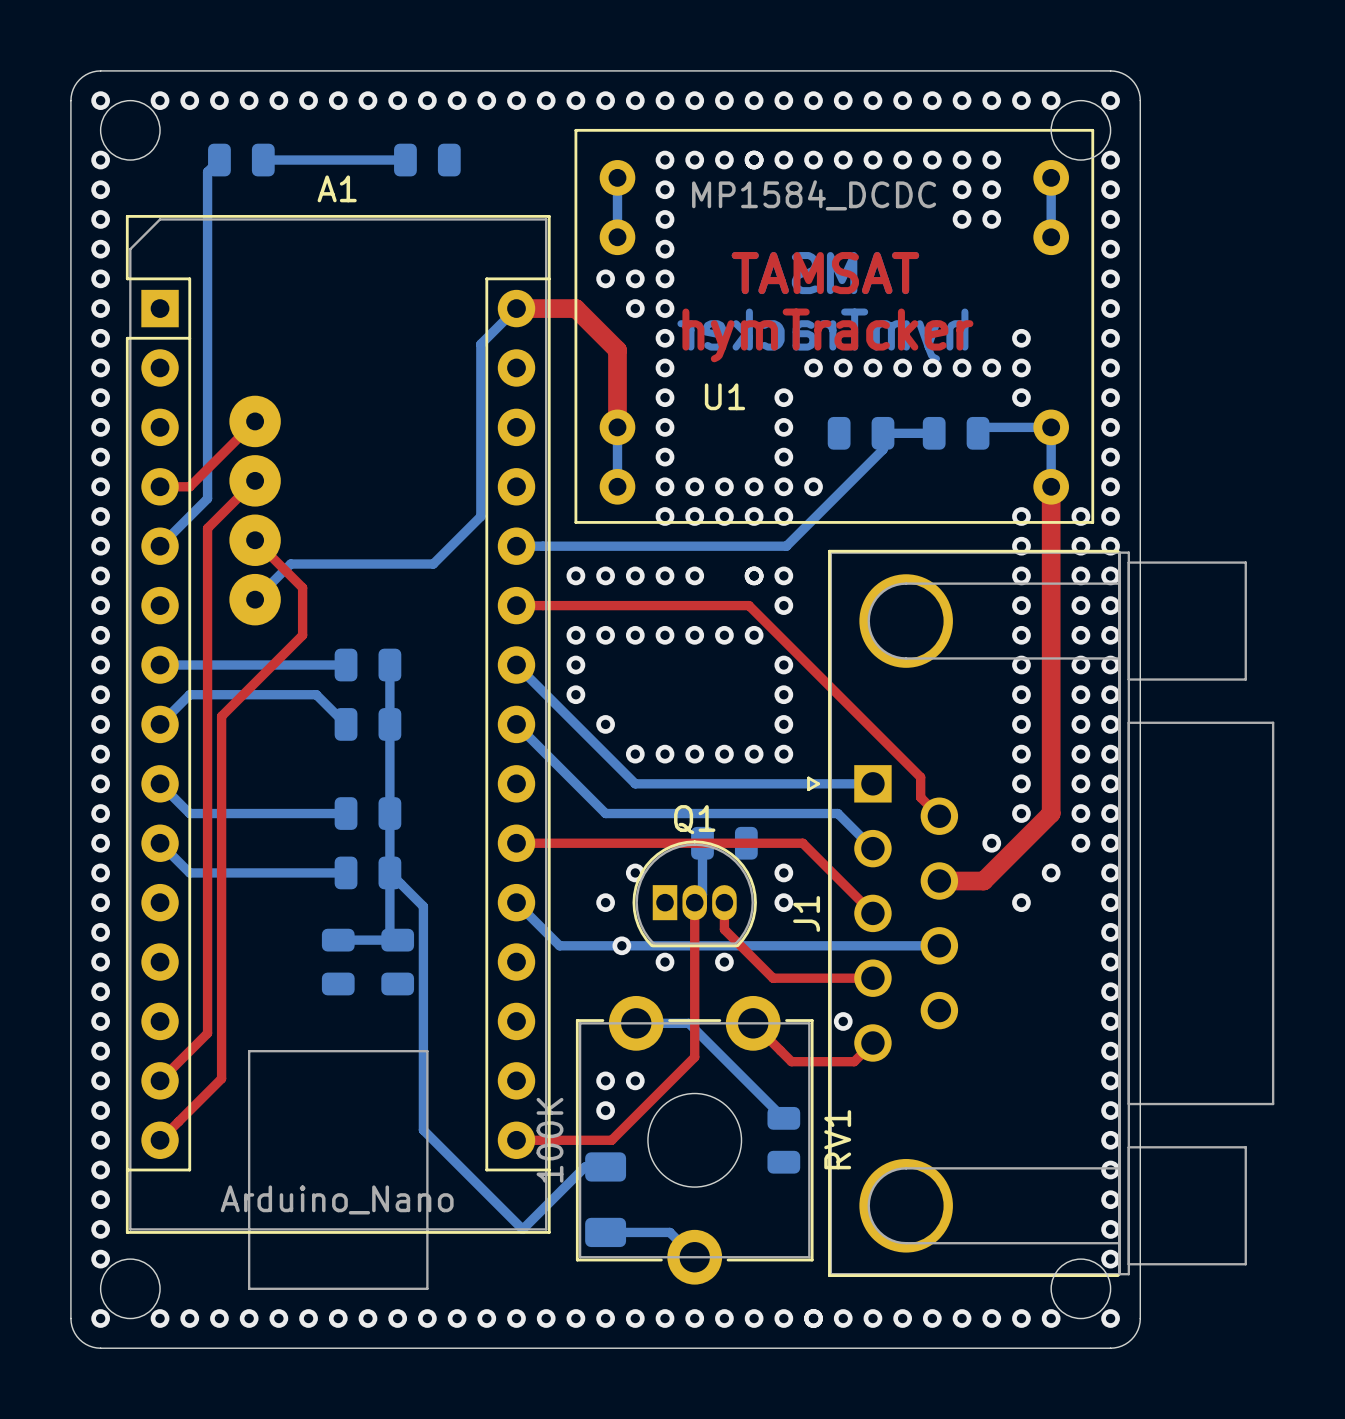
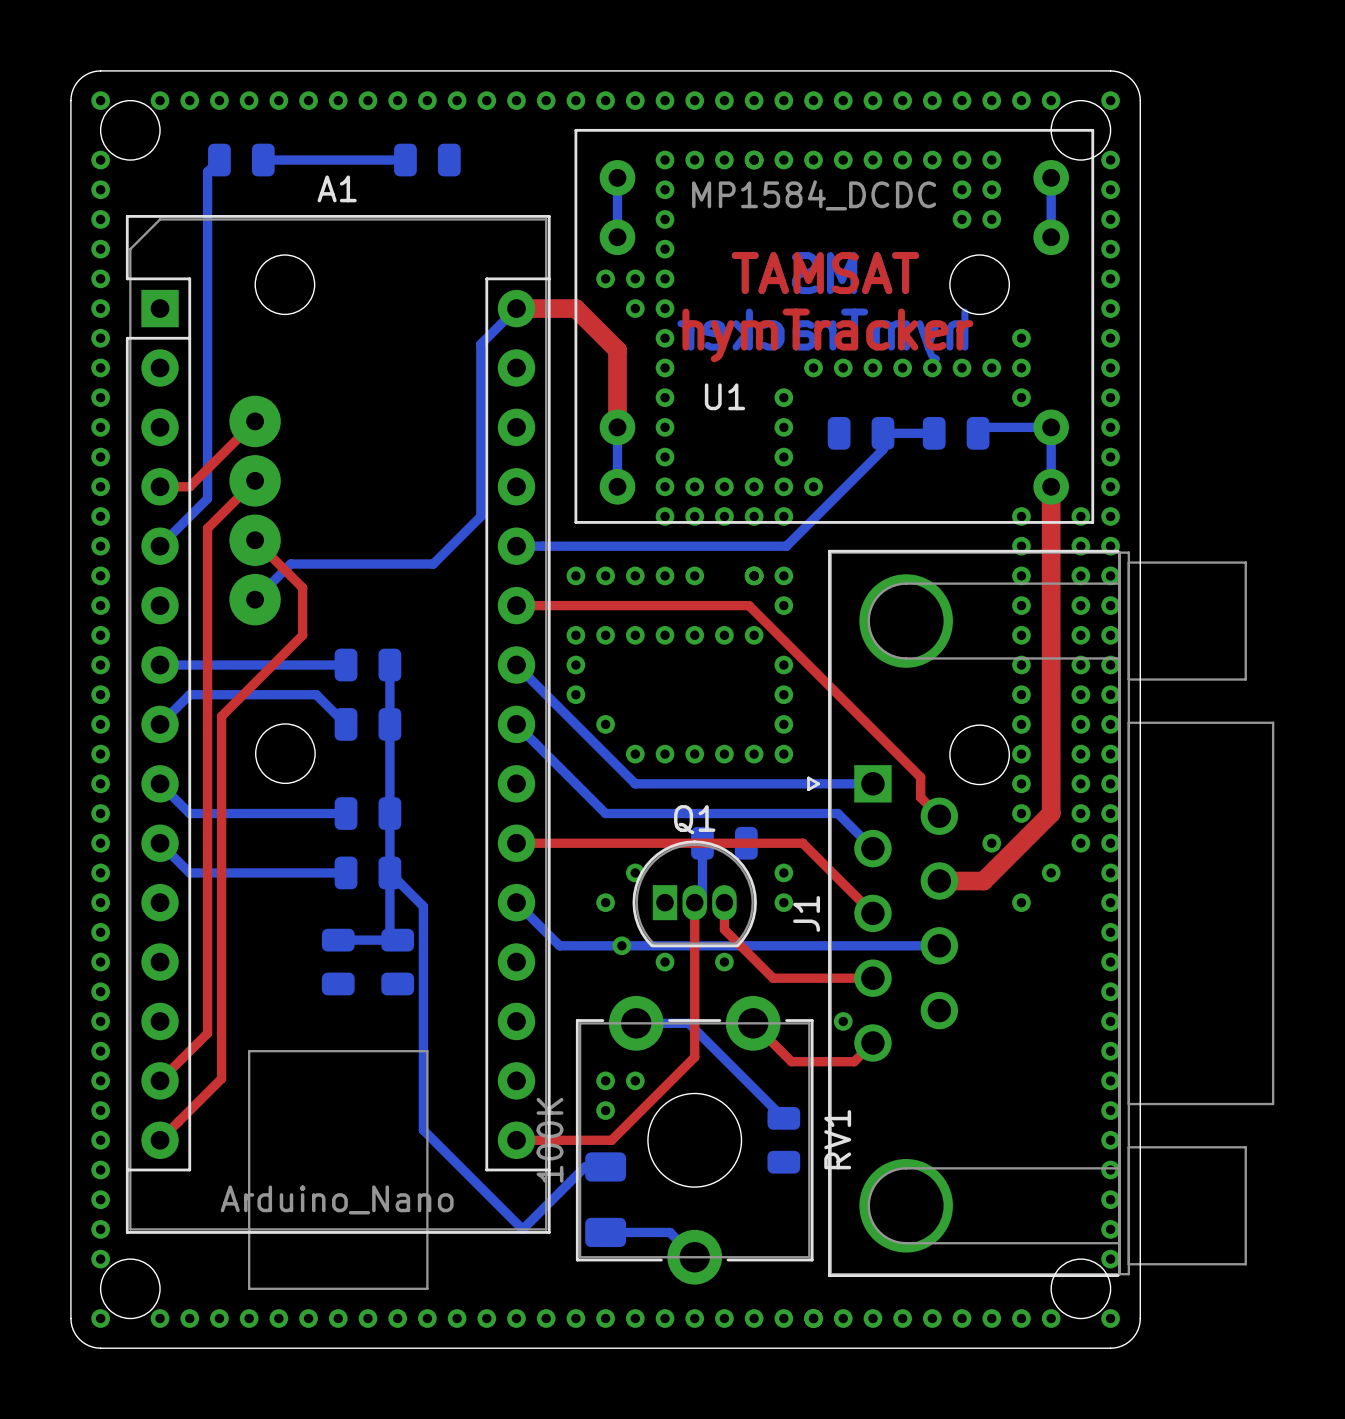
round board edge: none -> [254, 254, 316, 315]
round board edge: none -> [949, 254, 1010, 315]
round board edge: none -> [255, 723, 316, 784]
round board edge: none -> [949, 724, 1010, 786]

